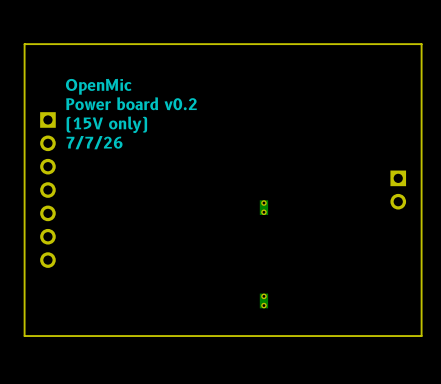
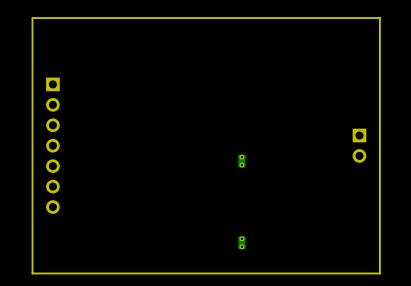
text: OpenMic (98, 86) -> none
text: Power board v0.2 (131, 103) -> none
text: (15V only) (106, 124) -> none
text: 7/7/26 (94, 142) -> none

